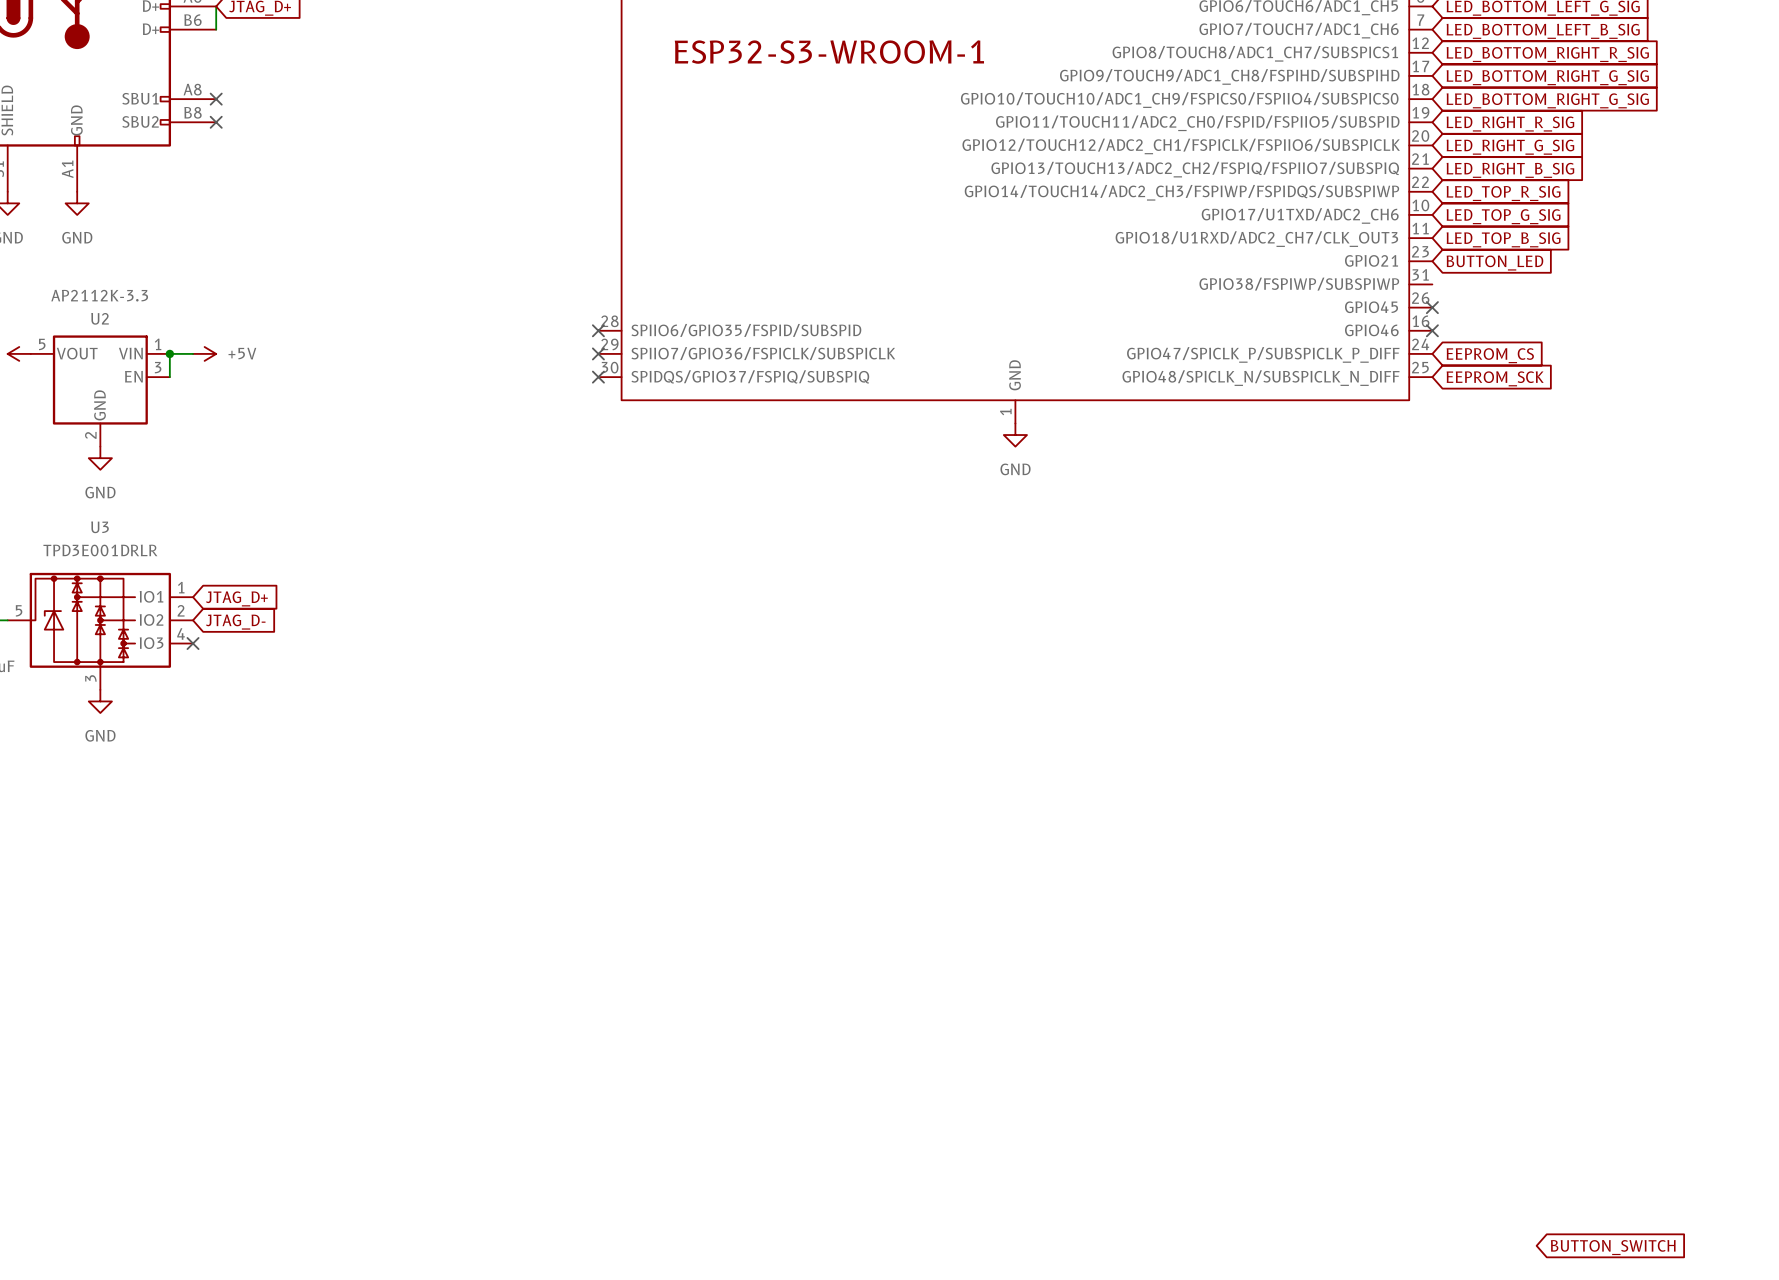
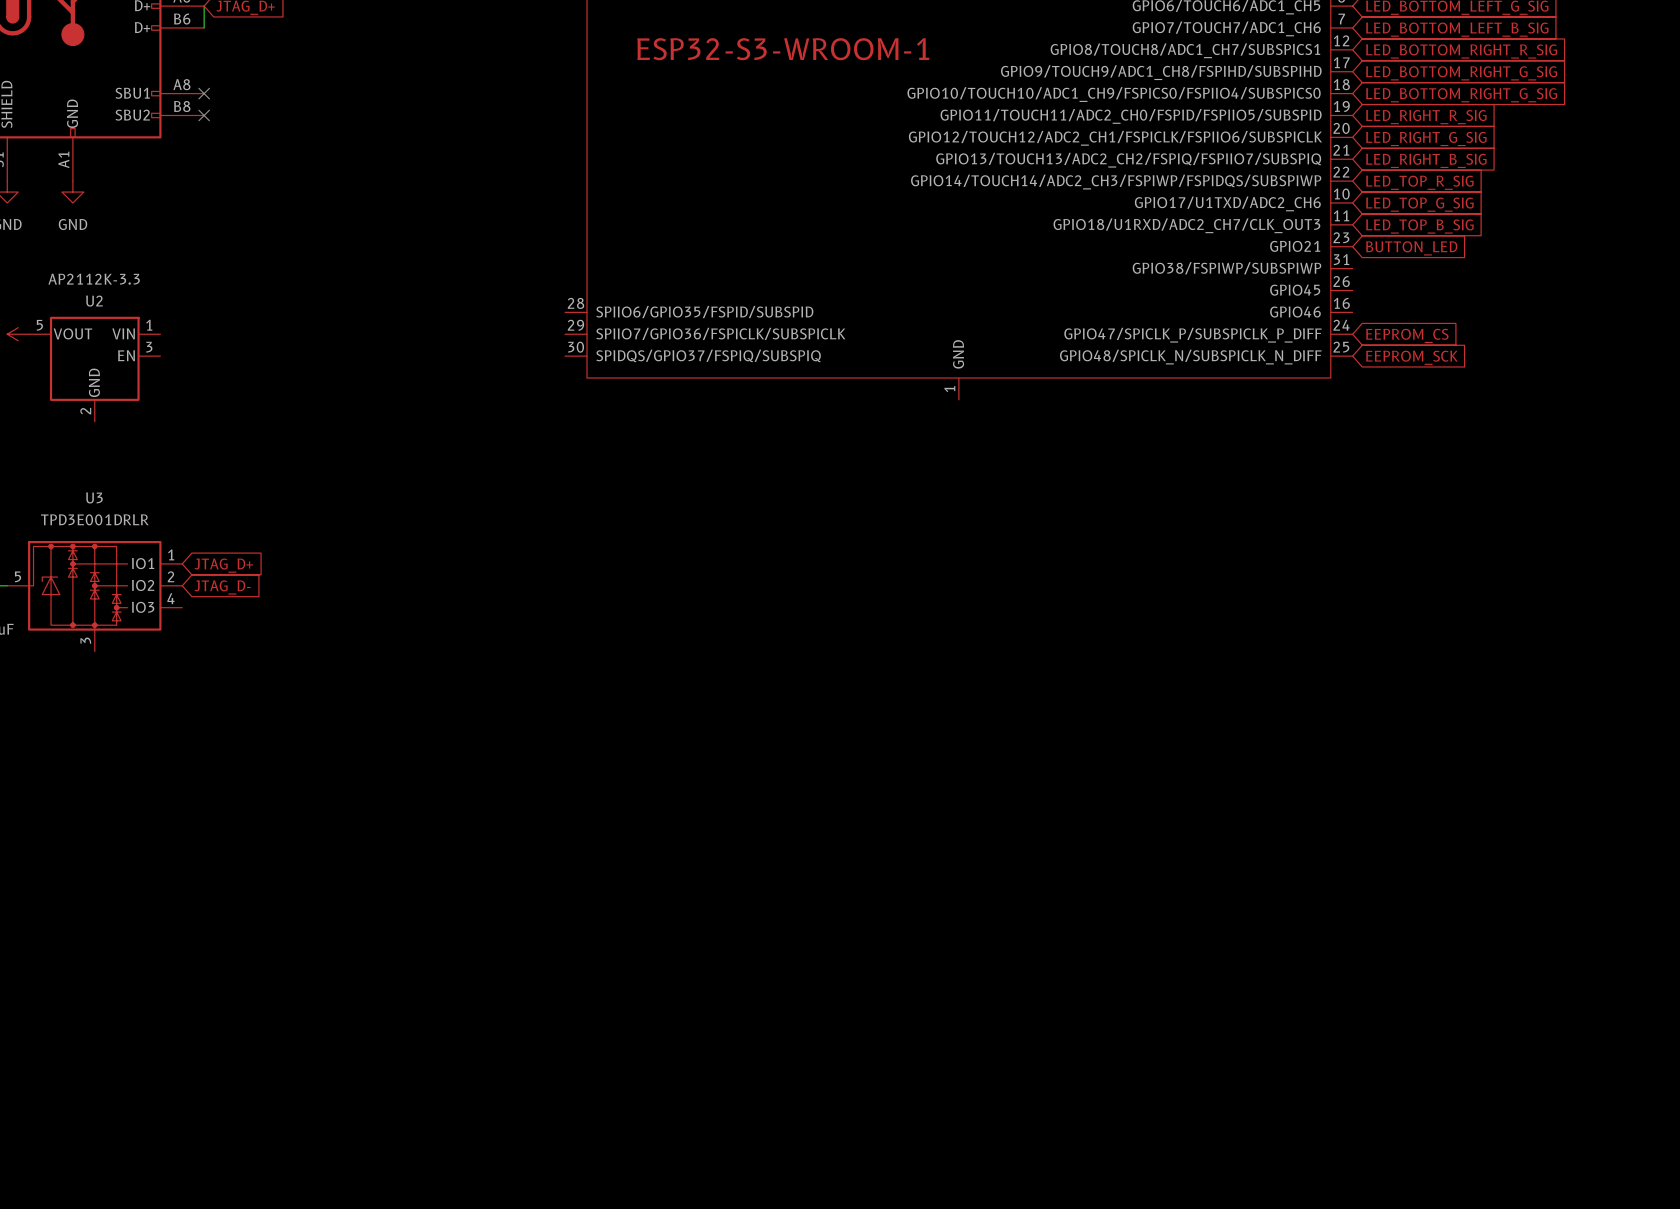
no-connect mark: (1432, 307) -> none
no-connect mark: (598, 330) -> none
no-connect mark: (1432, 330) -> none
junction: (169, 353) -> none
wire: (193, 353) (169, 353) (169, 377) -> none
power symbol: +5V (204, 353) -> none
no-connect mark: (598, 353) -> none
no-connect mark: (598, 377) -> none
power symbol: GND (1015, 435) -> none
power symbol: GND (100, 458) -> none
no-connect mark: (193, 643) -> none
power symbol: GND (100, 701) -> none
global label: BUTTON_SWITCH (1613, 1247) -> none

